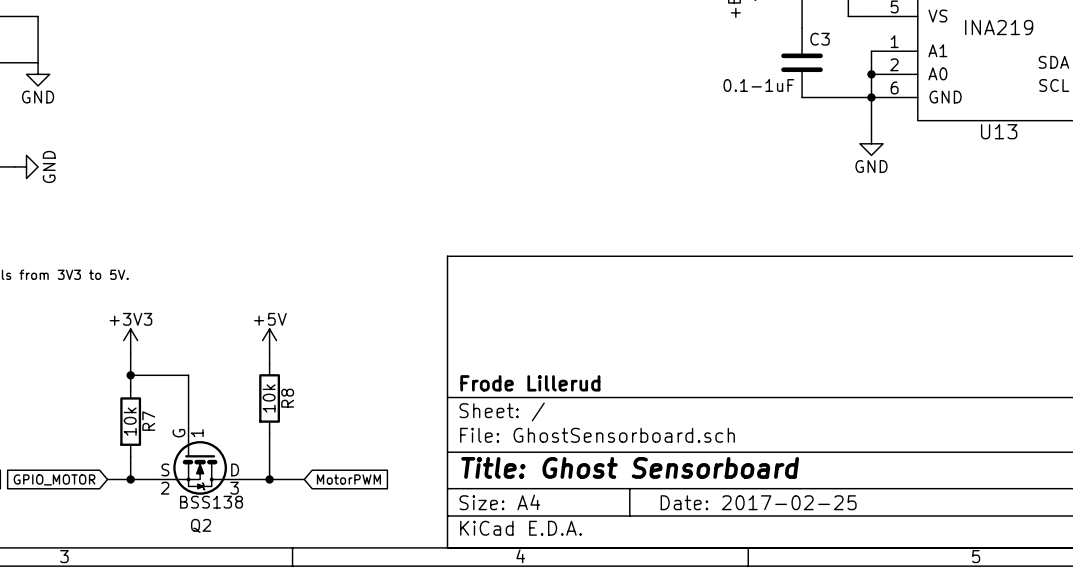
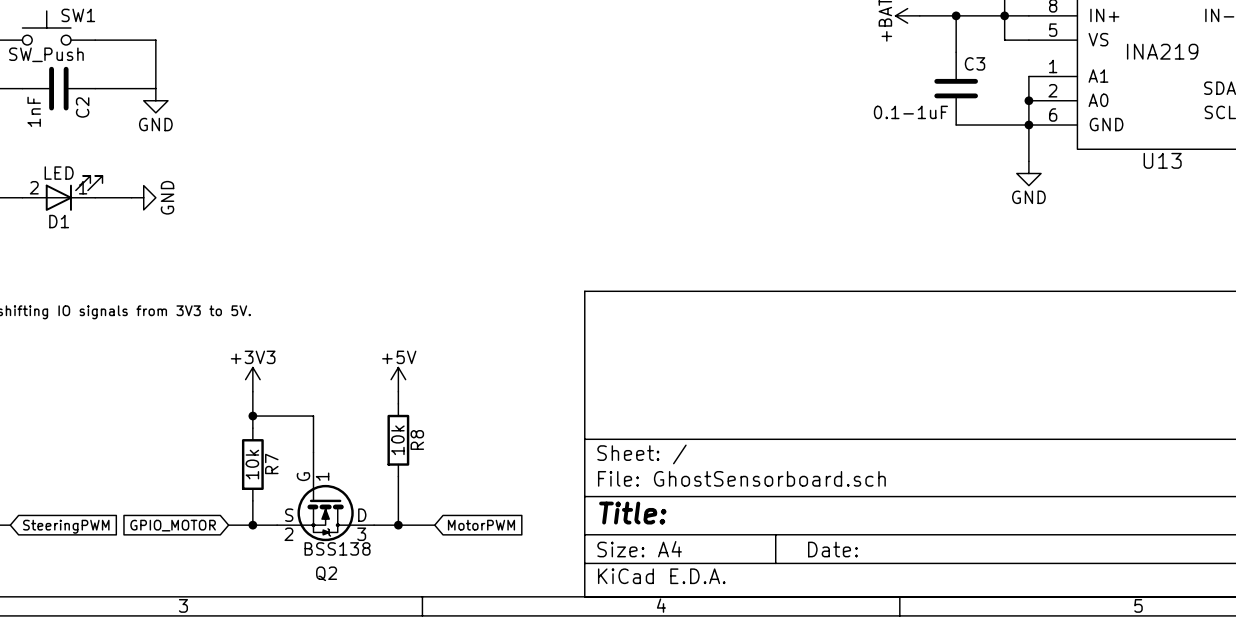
title block: Frode Lillerud (530, 383) -> none
title block: Title: Ghost Sensorboard (630, 467) -> Title: (632, 513)
title block: Date: 2017-02-25 (758, 502) -> Date: (832, 549)

